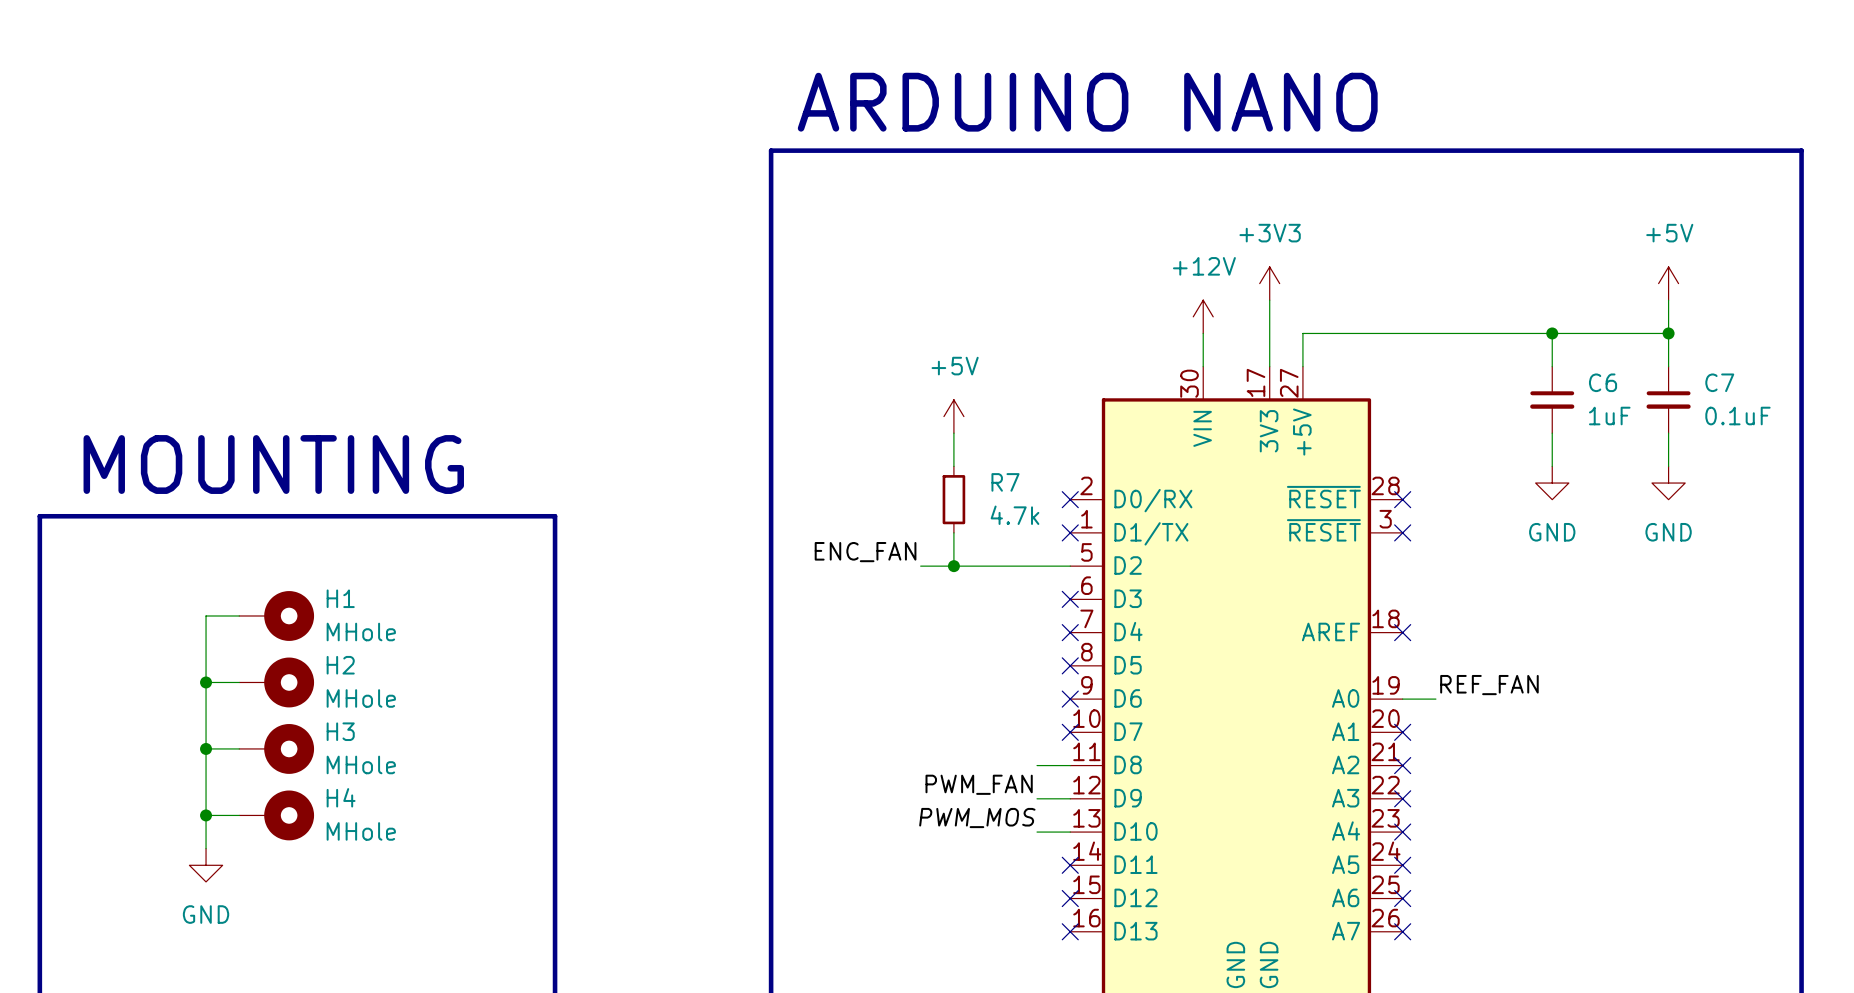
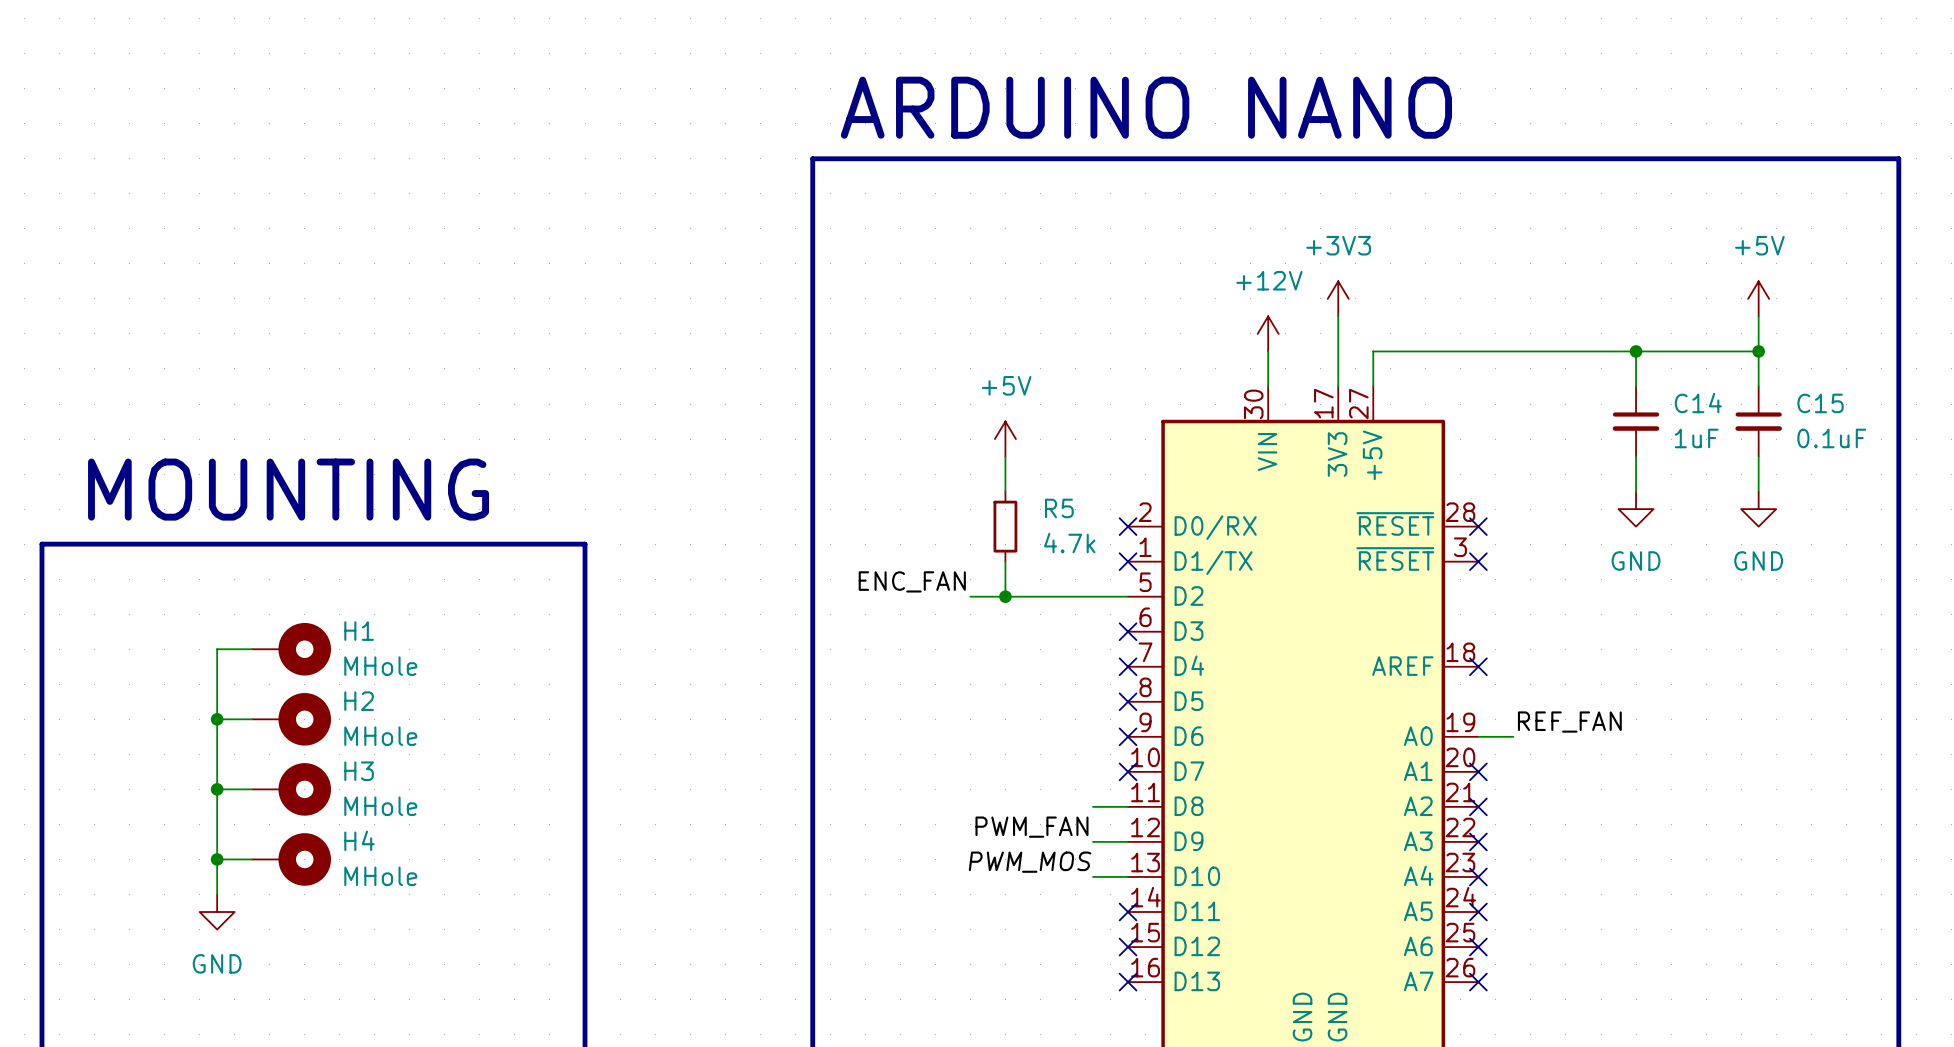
C6 name: C6 (1603, 382) -> C14 (1698, 403)
C7 name: C7 (1719, 382) -> C15 (1820, 403)
R7 name: R7 (1005, 482) -> R5 (1059, 508)

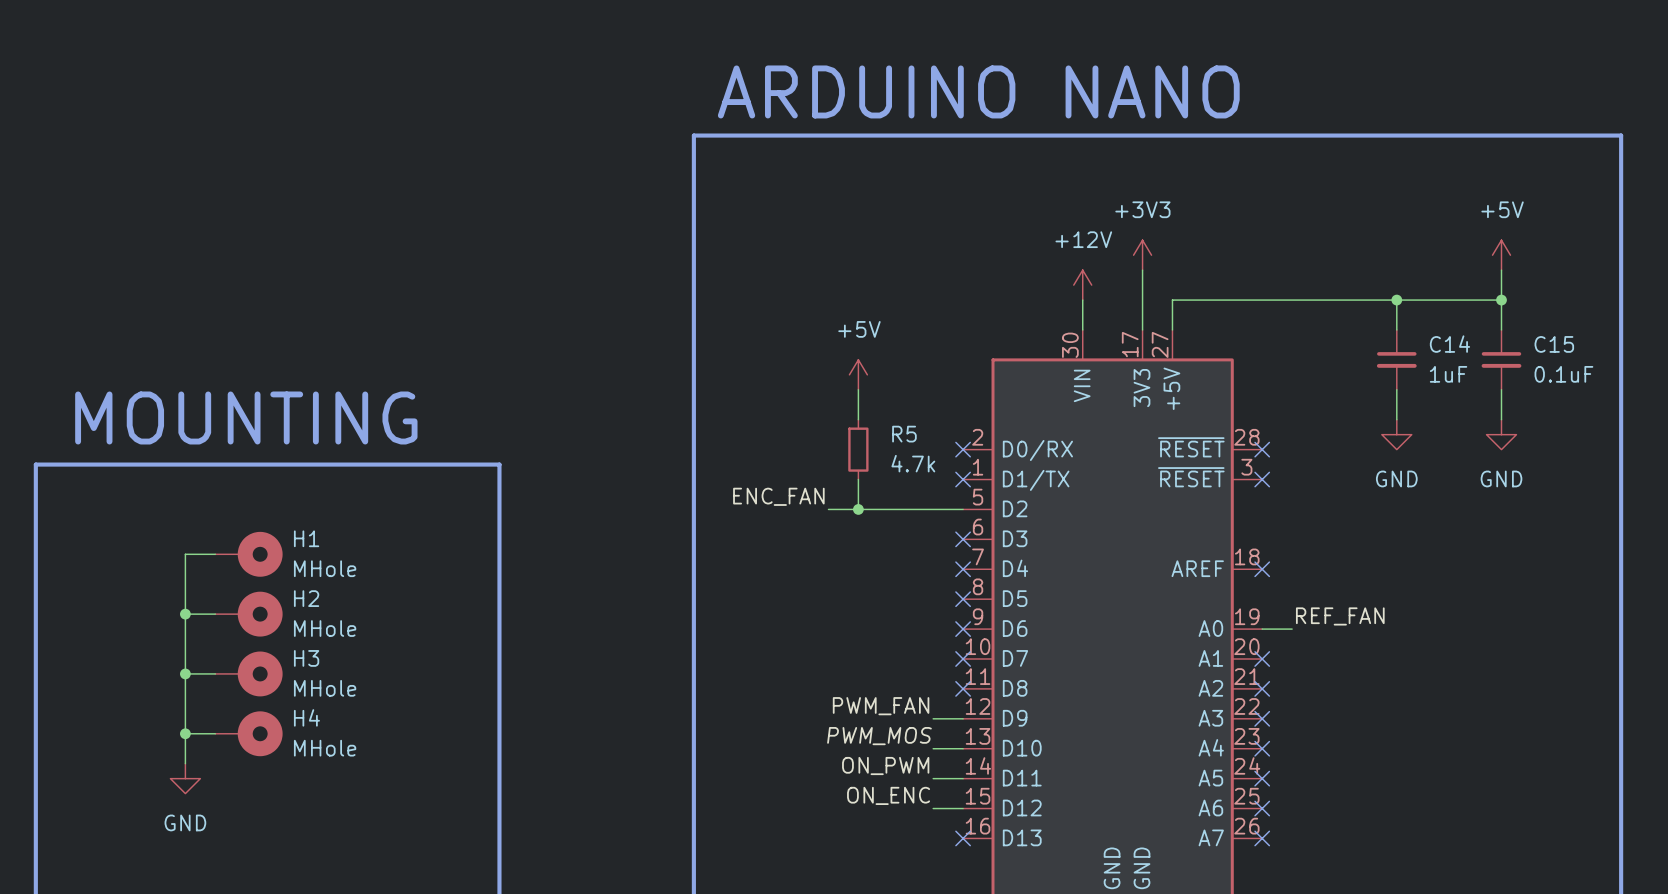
wire: (1093, 806) (1128, 806) -> (933, 778) (963, 778)
no-connect mark: none -> (963, 688)
label: none -> ON_PWM (885, 766)
no-connect mark: (1128, 912) -> none
label: none -> ON_ENC (888, 795)
wire: none -> (933, 808) (963, 808)
no-connect mark: (1128, 947) -> none

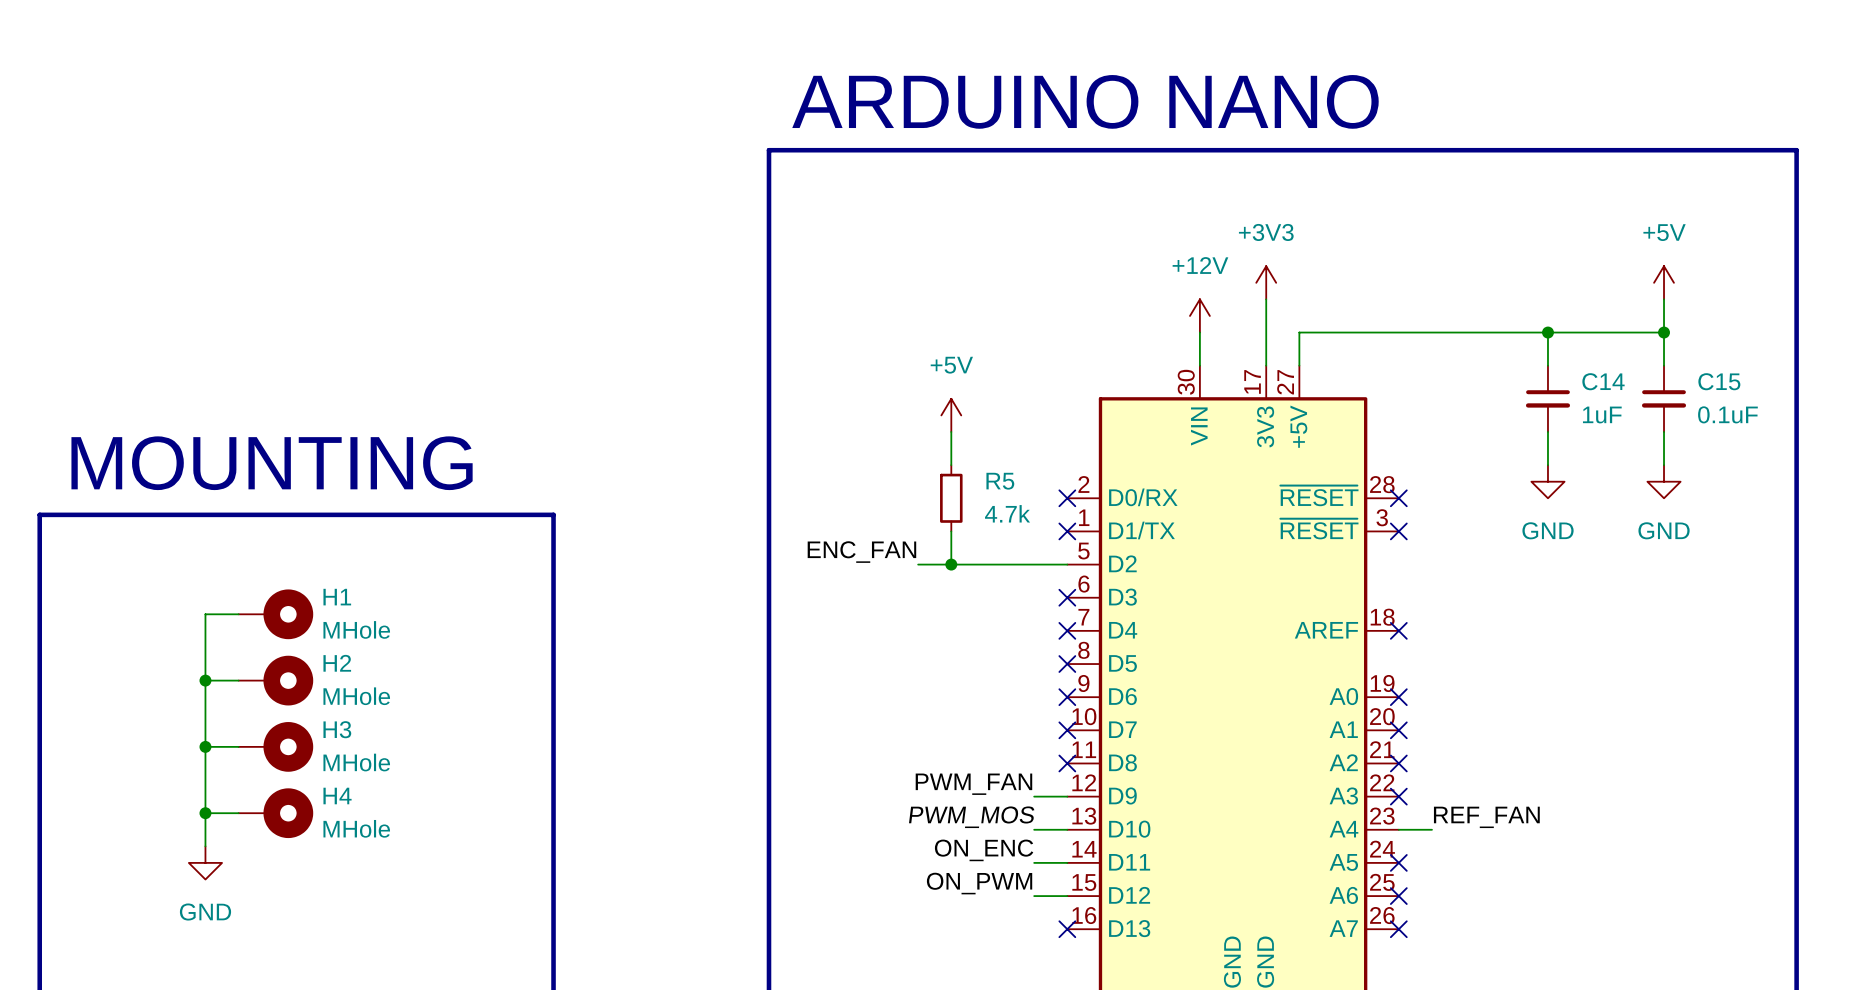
label position: REF_FAN (1340, 616) -> REF_FAN (1486, 817)
wire: (1262, 629) (1292, 629) -> (1398, 829) (1431, 829)
no-connect mark: none -> (1398, 697)
no-connect mark: (1262, 748) -> none
label: ON_PWM (885, 766) -> ON_ENC (984, 850)
label: ON_ENC (888, 795) -> ON_PWM (979, 883)

